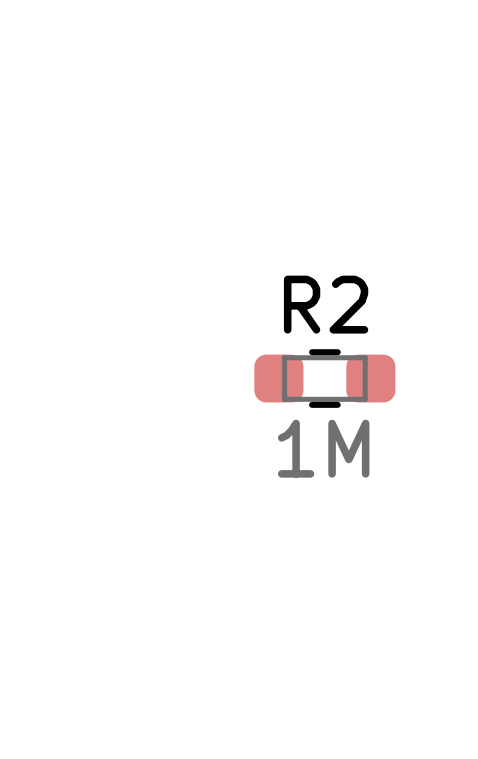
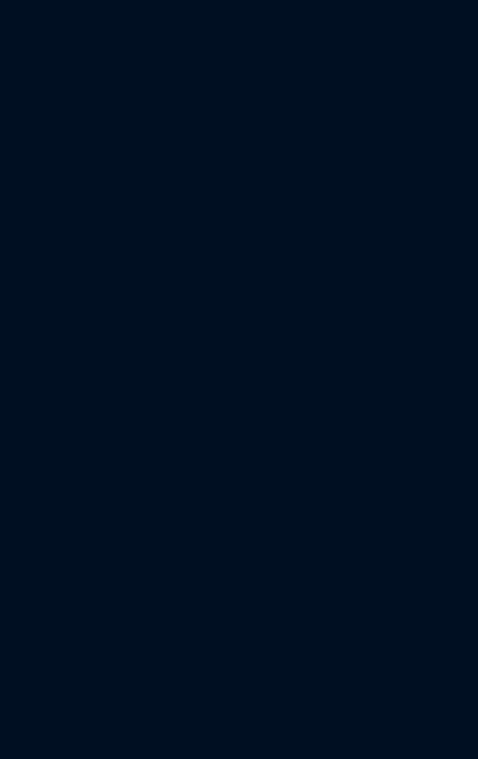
R2: 1M (324, 378) -> none

